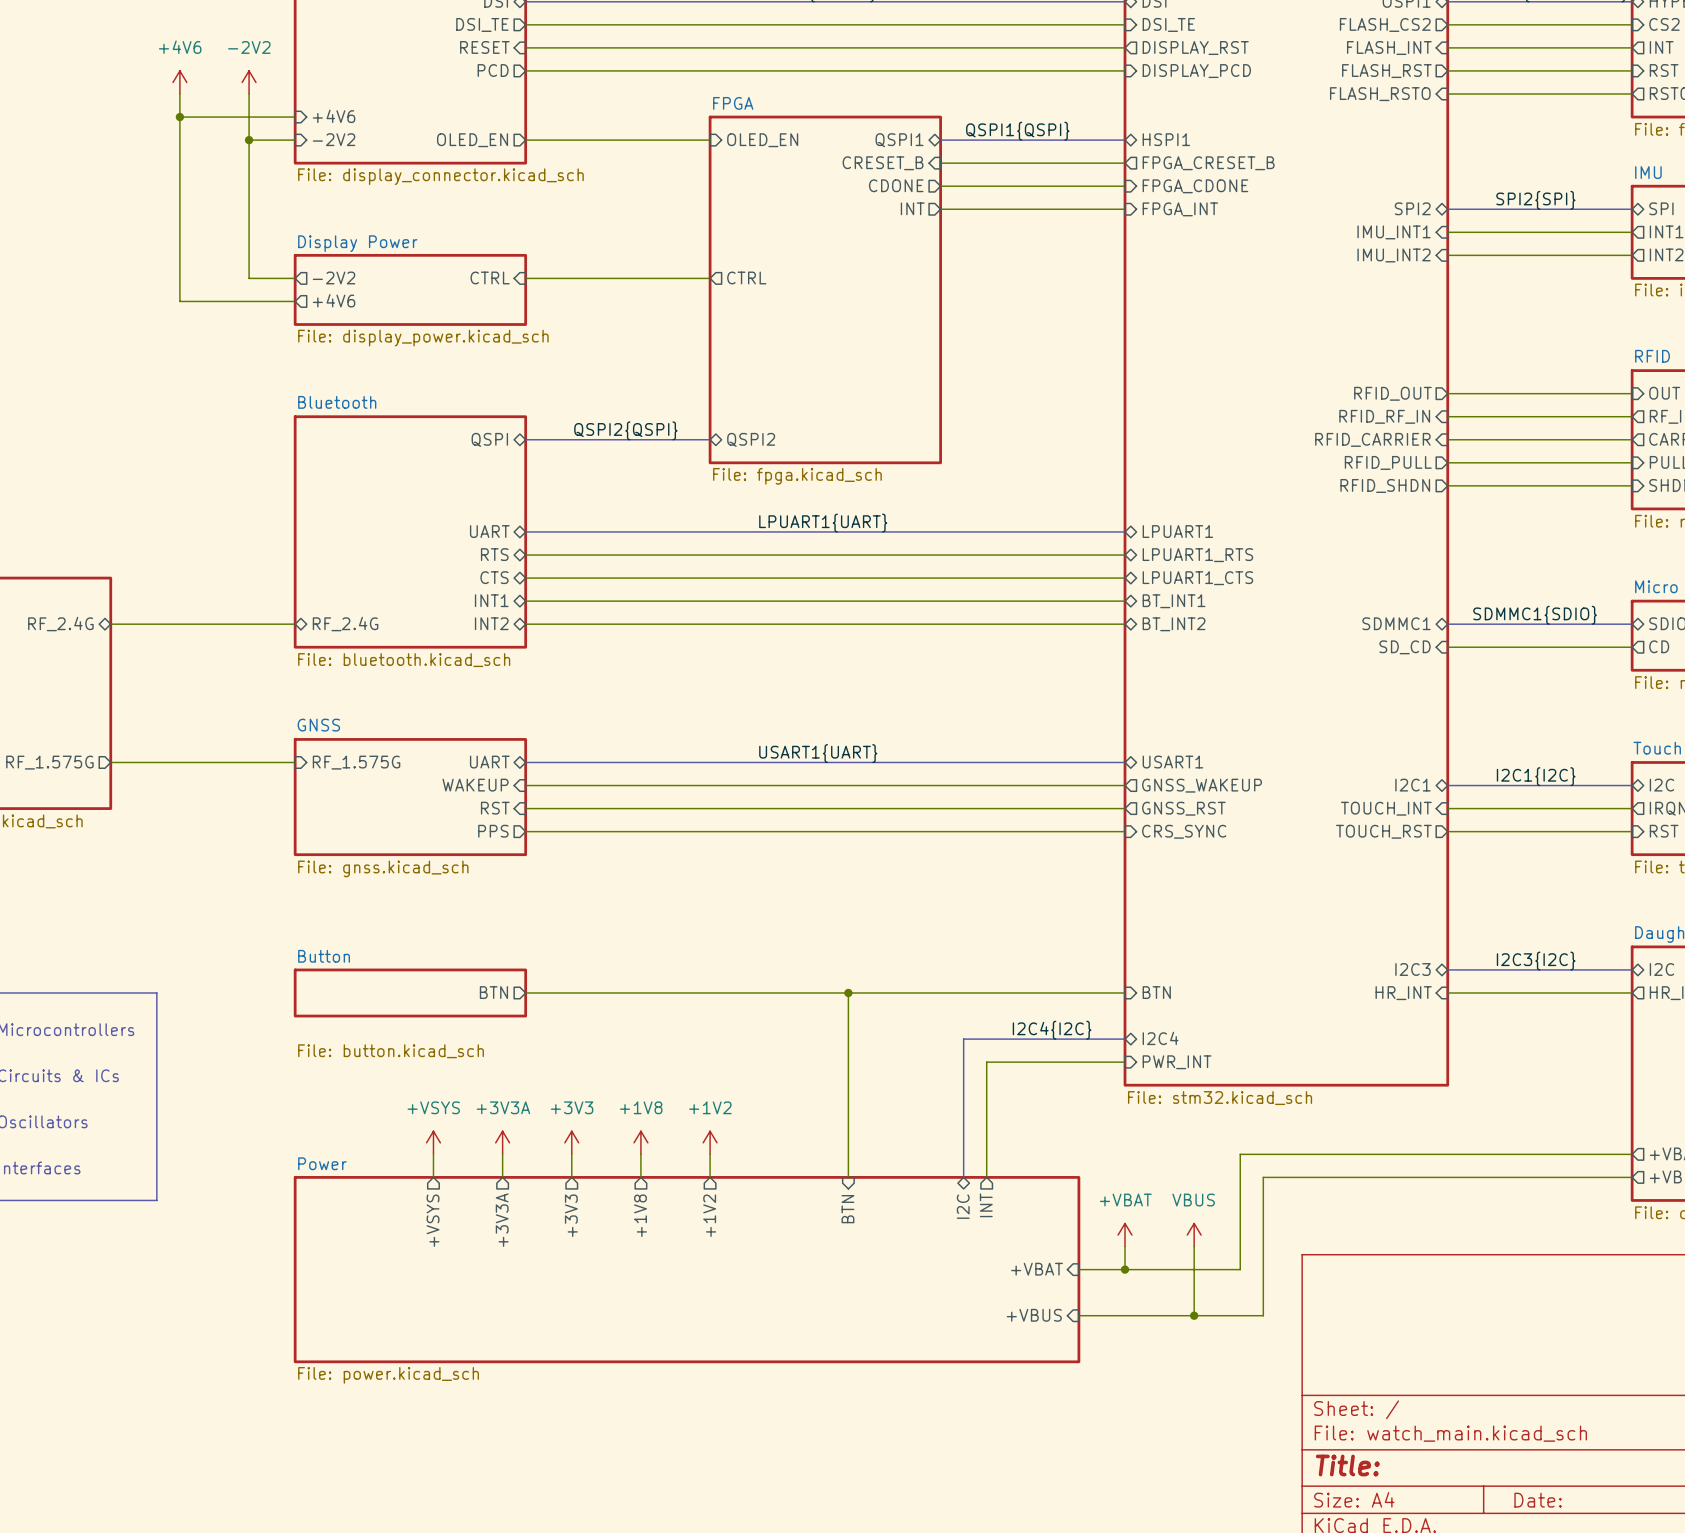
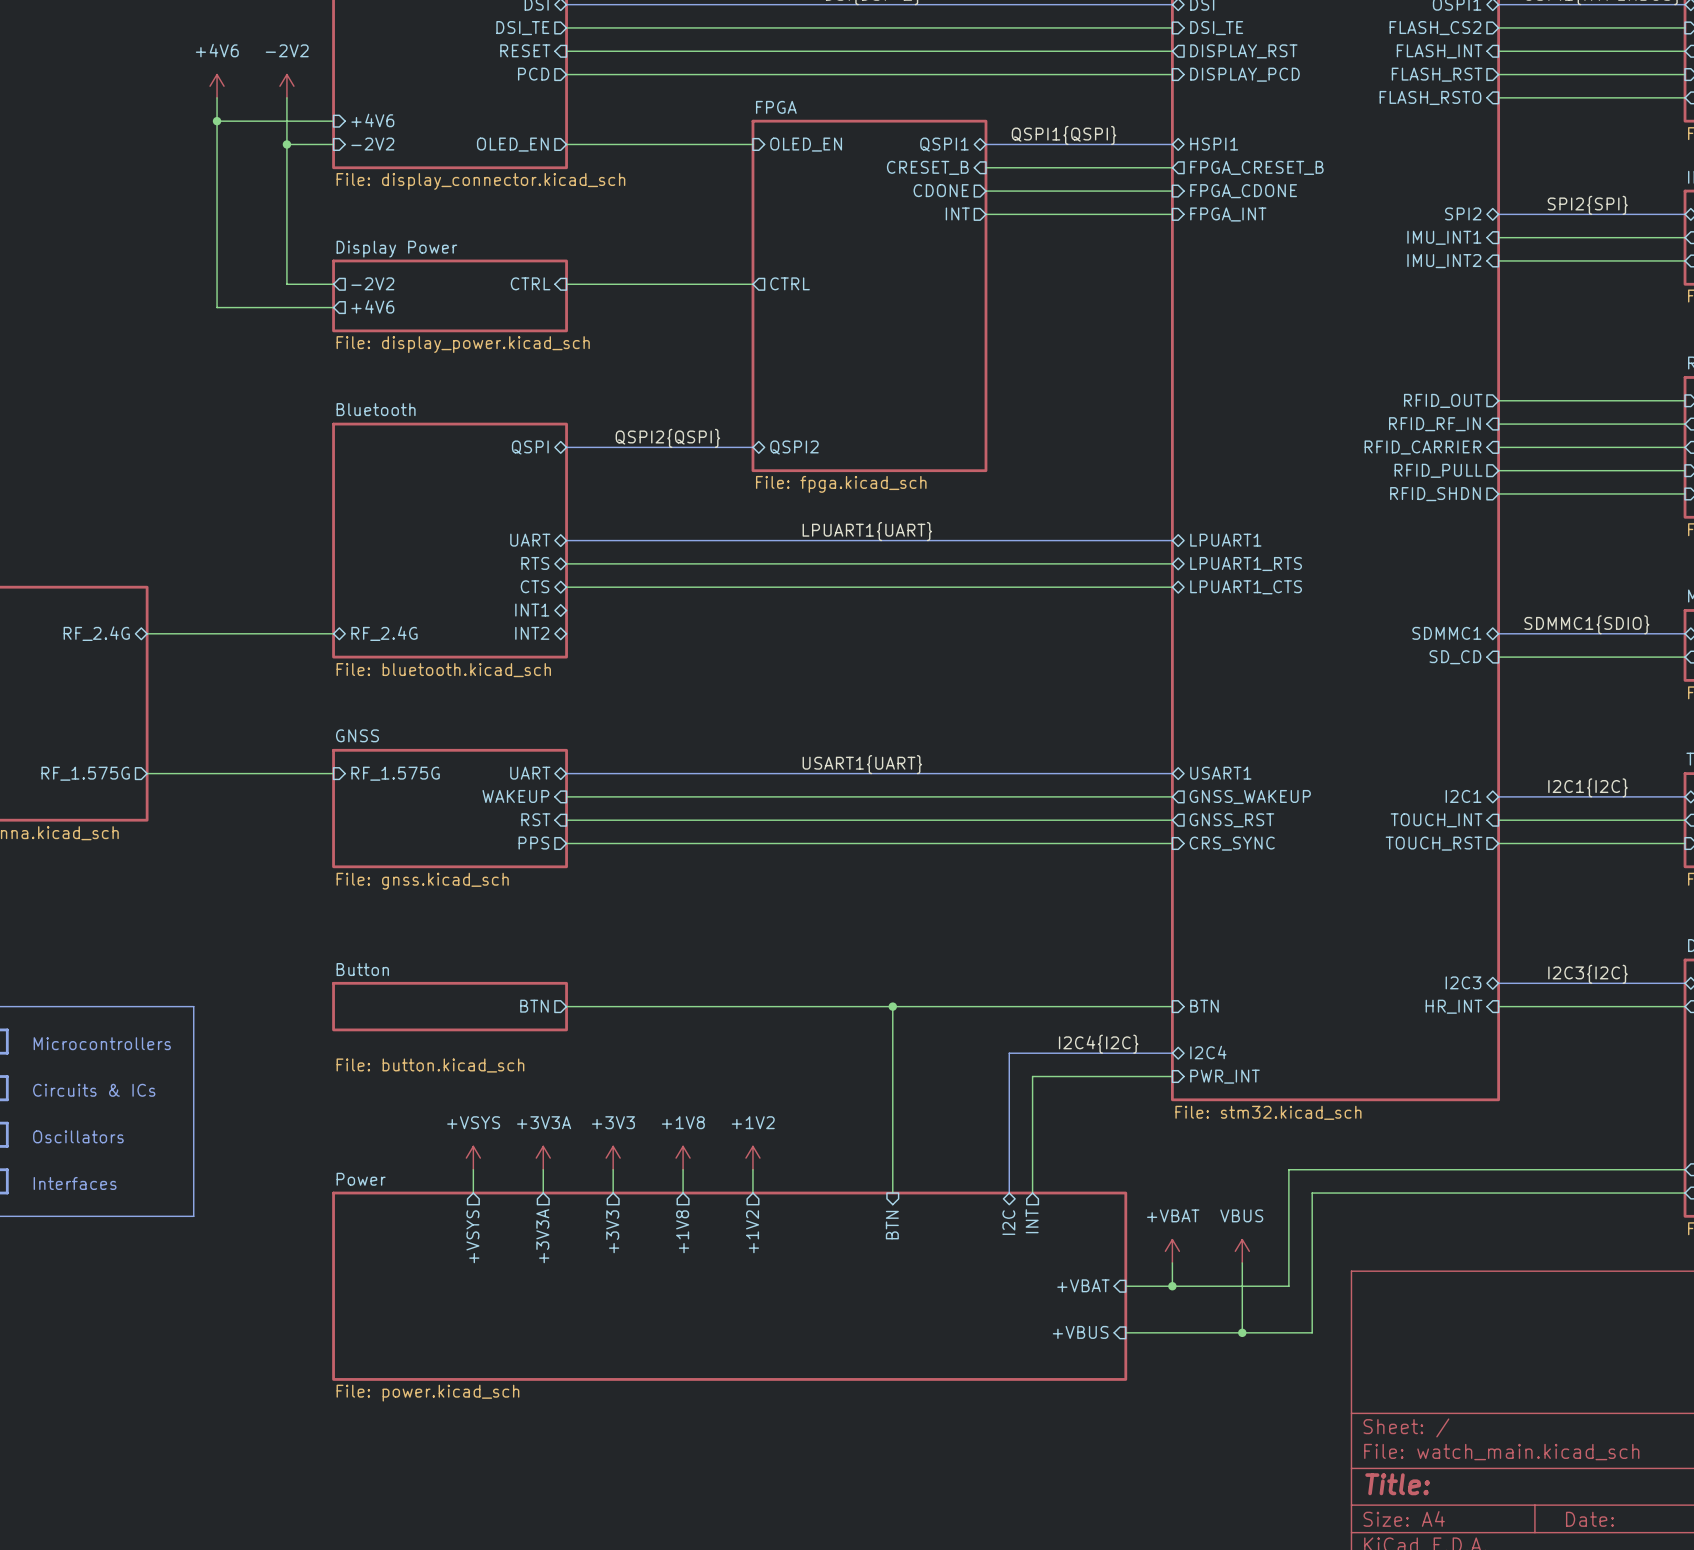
wire: (525, 601) (1125, 601) -> none
sheet pin: BT_INT1 (1174, 601) -> none
wire: (525, 624) (1125, 624) -> none
sheet pin: BT_INT2 (1174, 624) -> none

